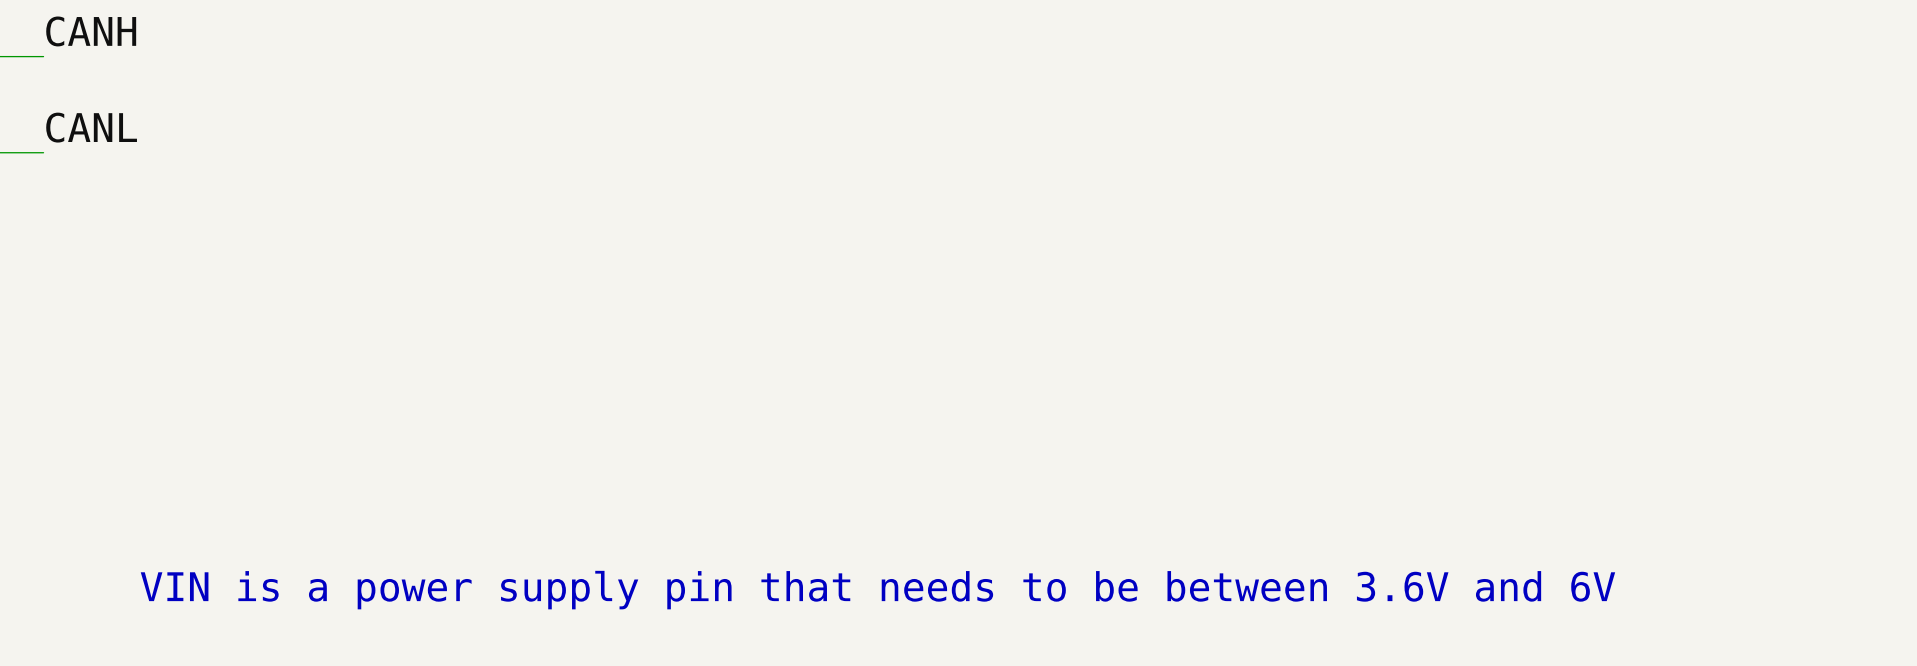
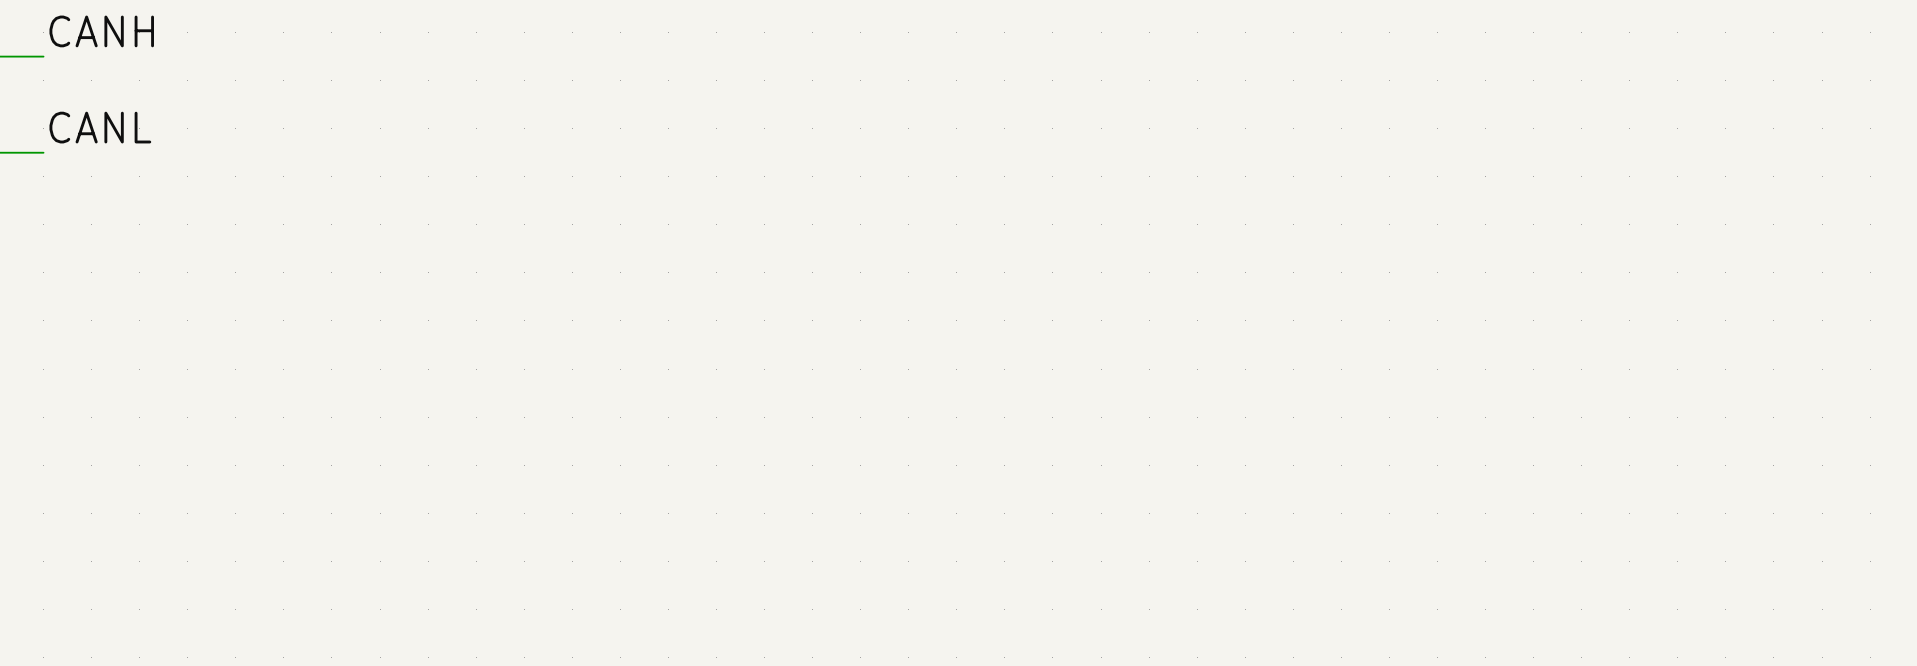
text: VIN is a power supply pin that needs to be between 3.6V and 6V (877, 590) -> none

